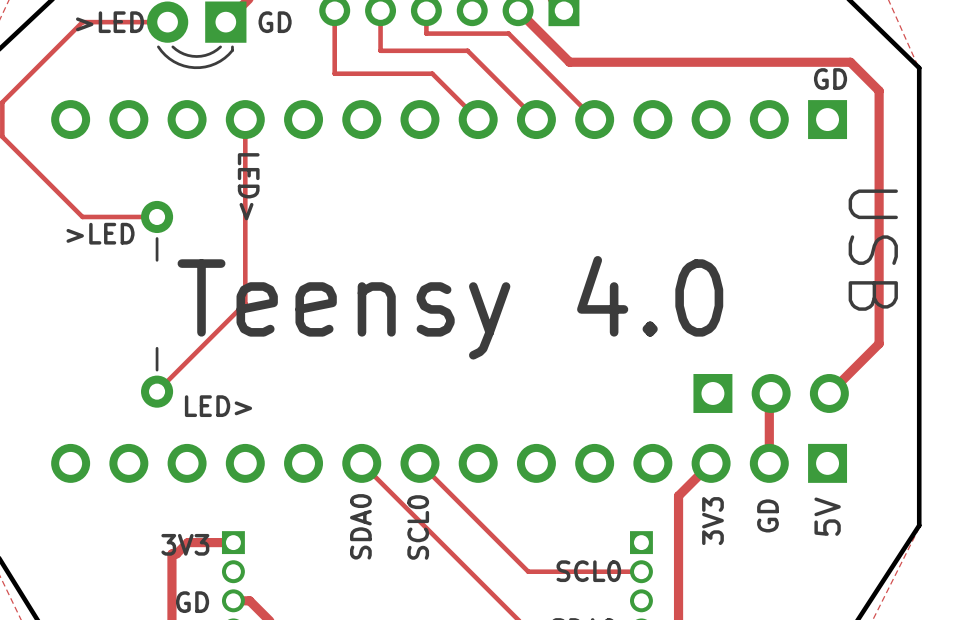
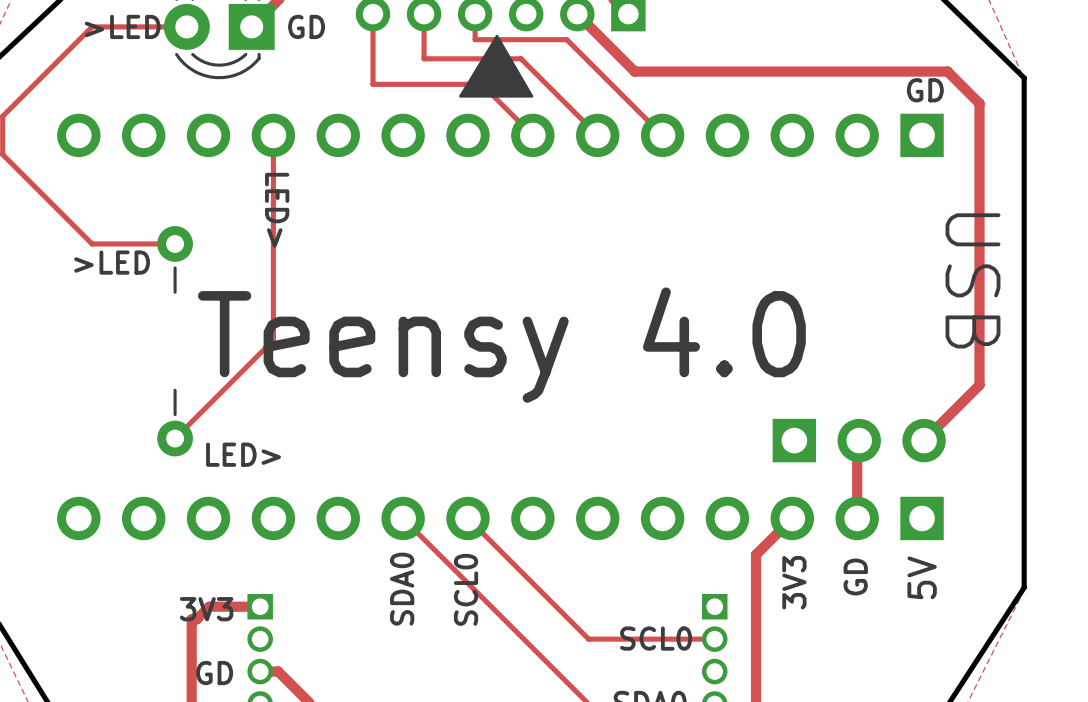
drawing: none -> [459, 34, 534, 98]

